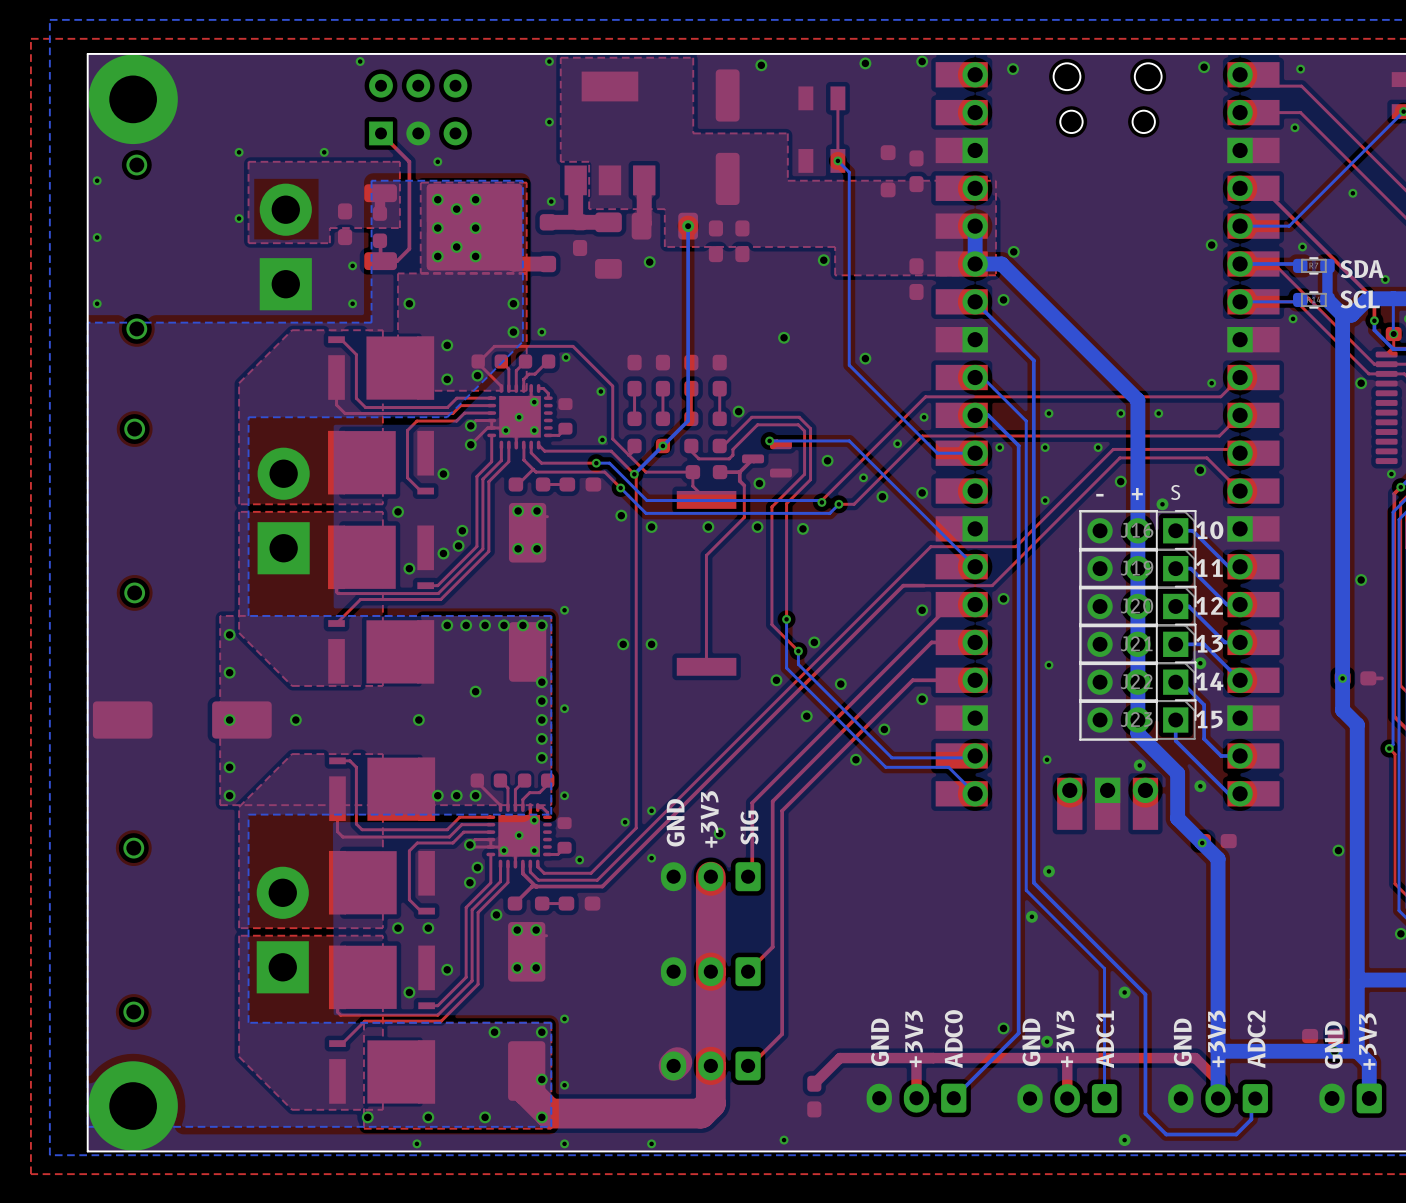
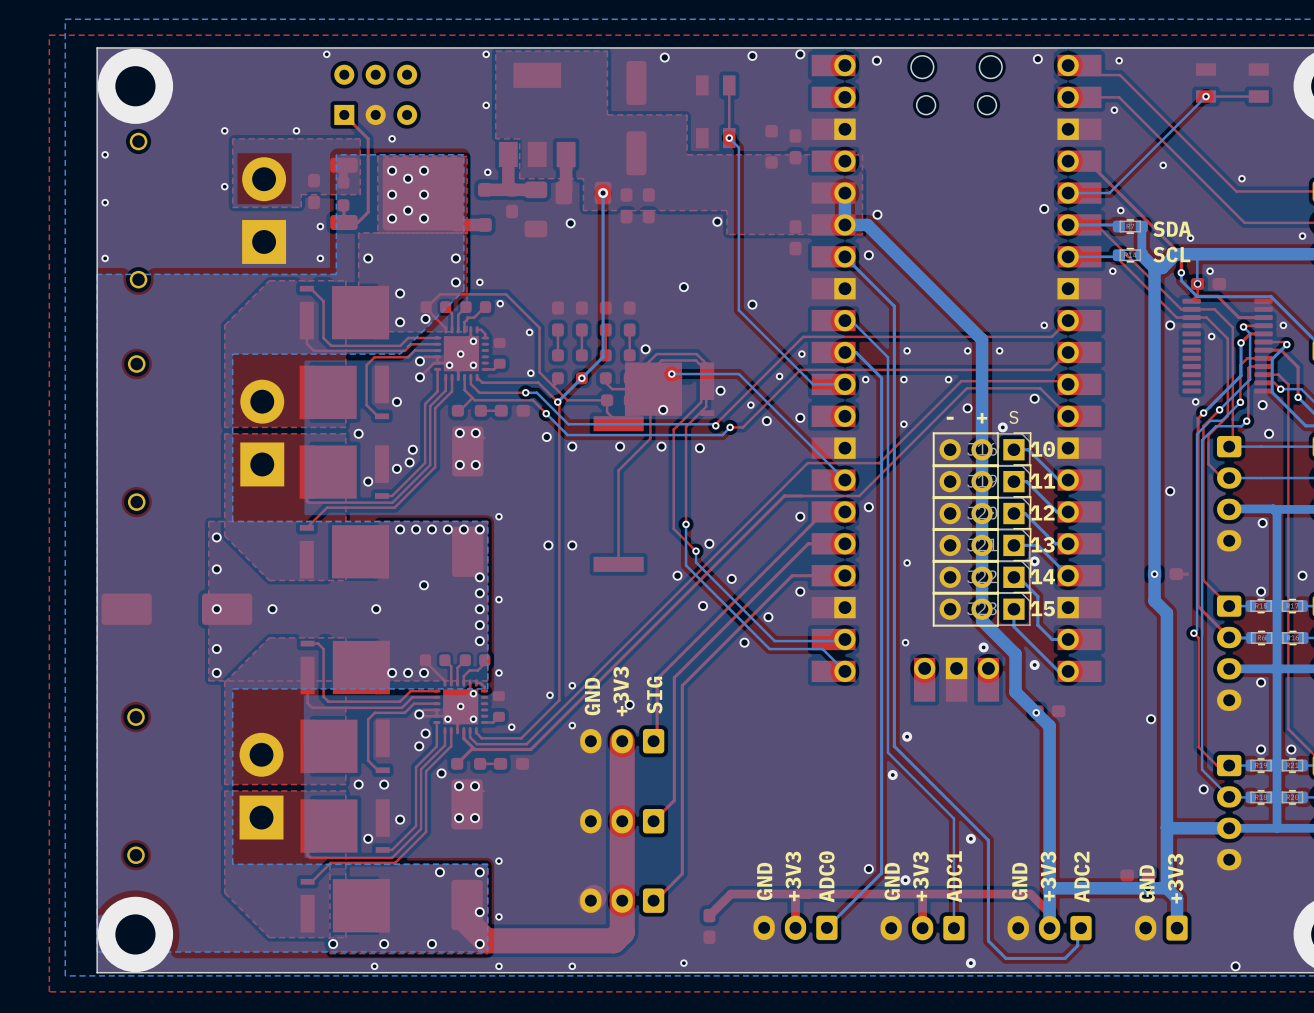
part footprint: [742, 440, 792, 478] -> [624, 362, 715, 416]

